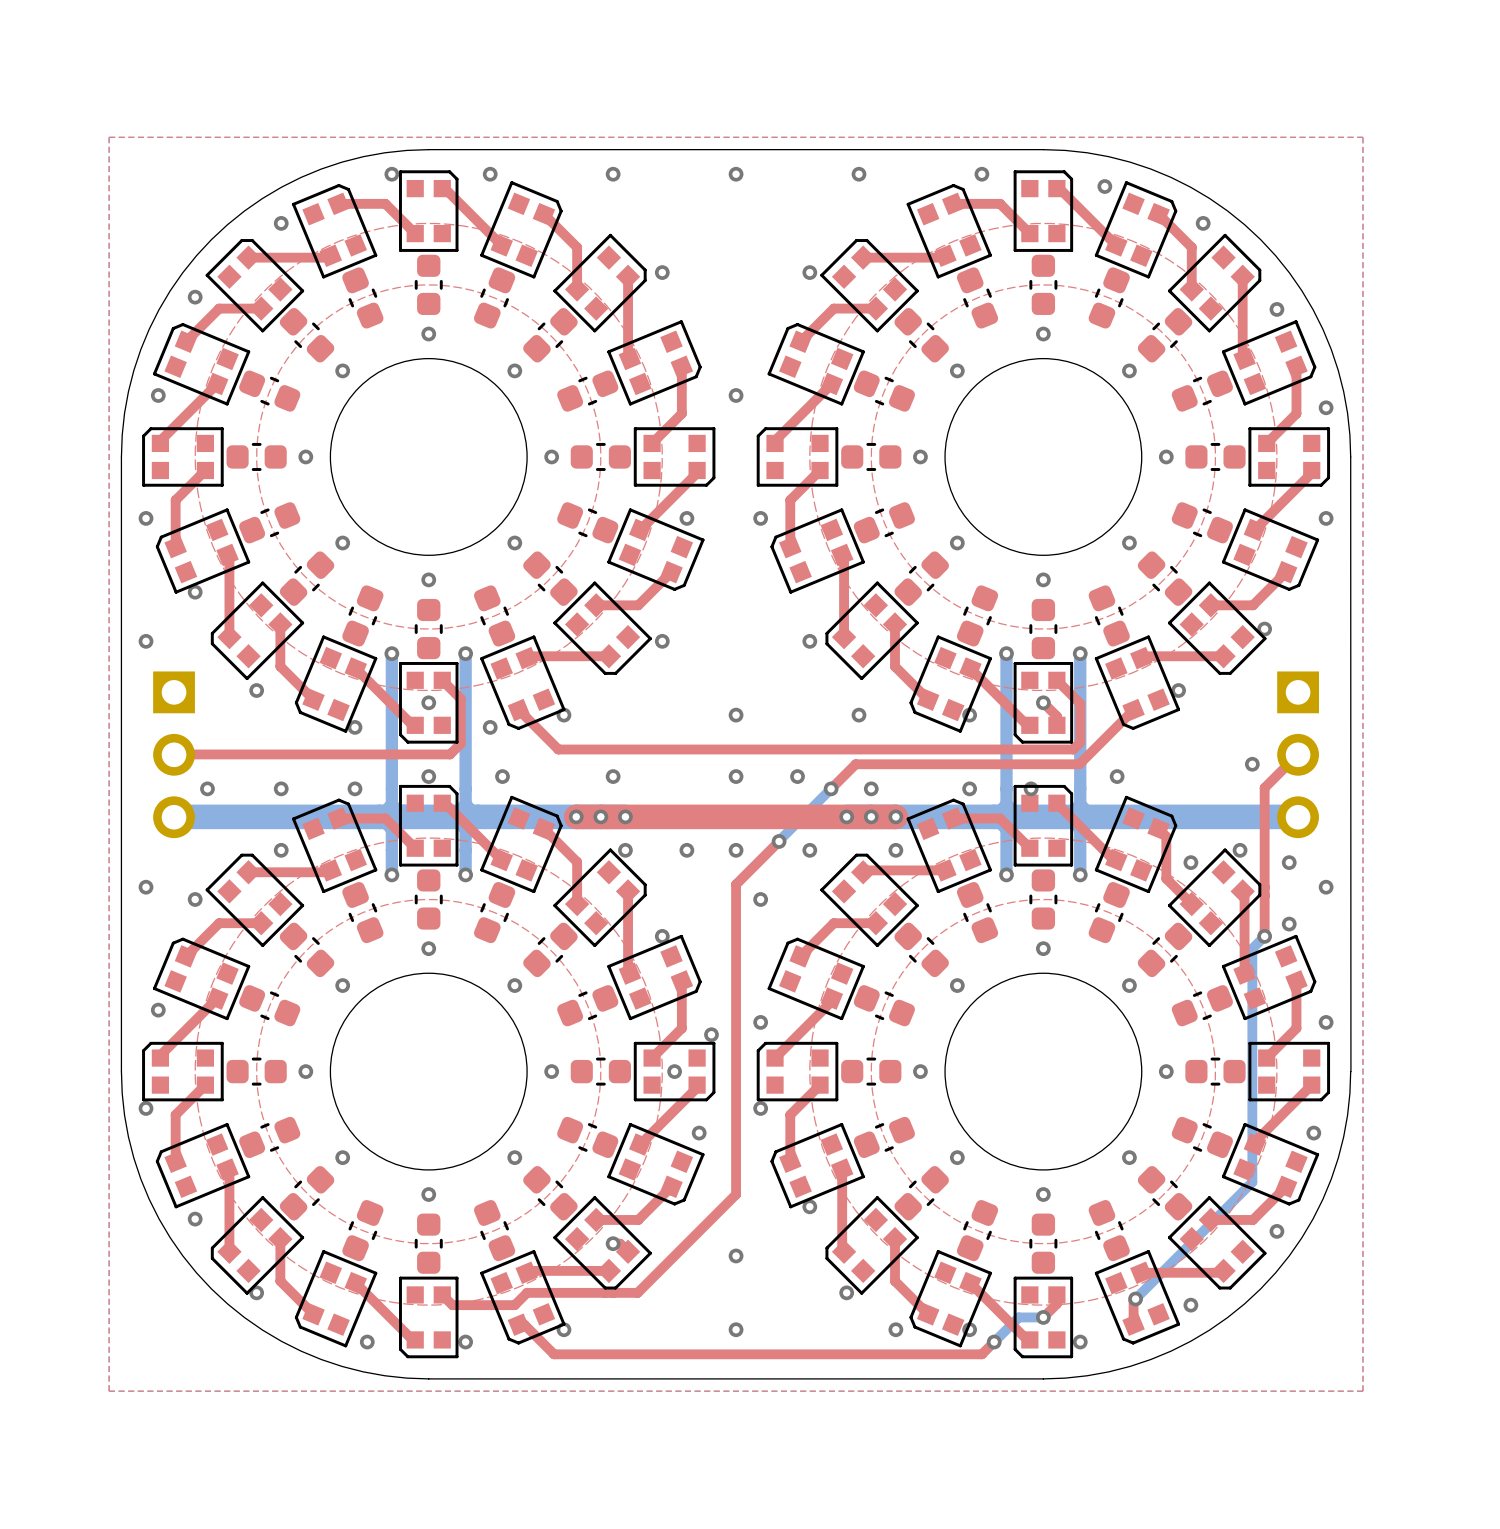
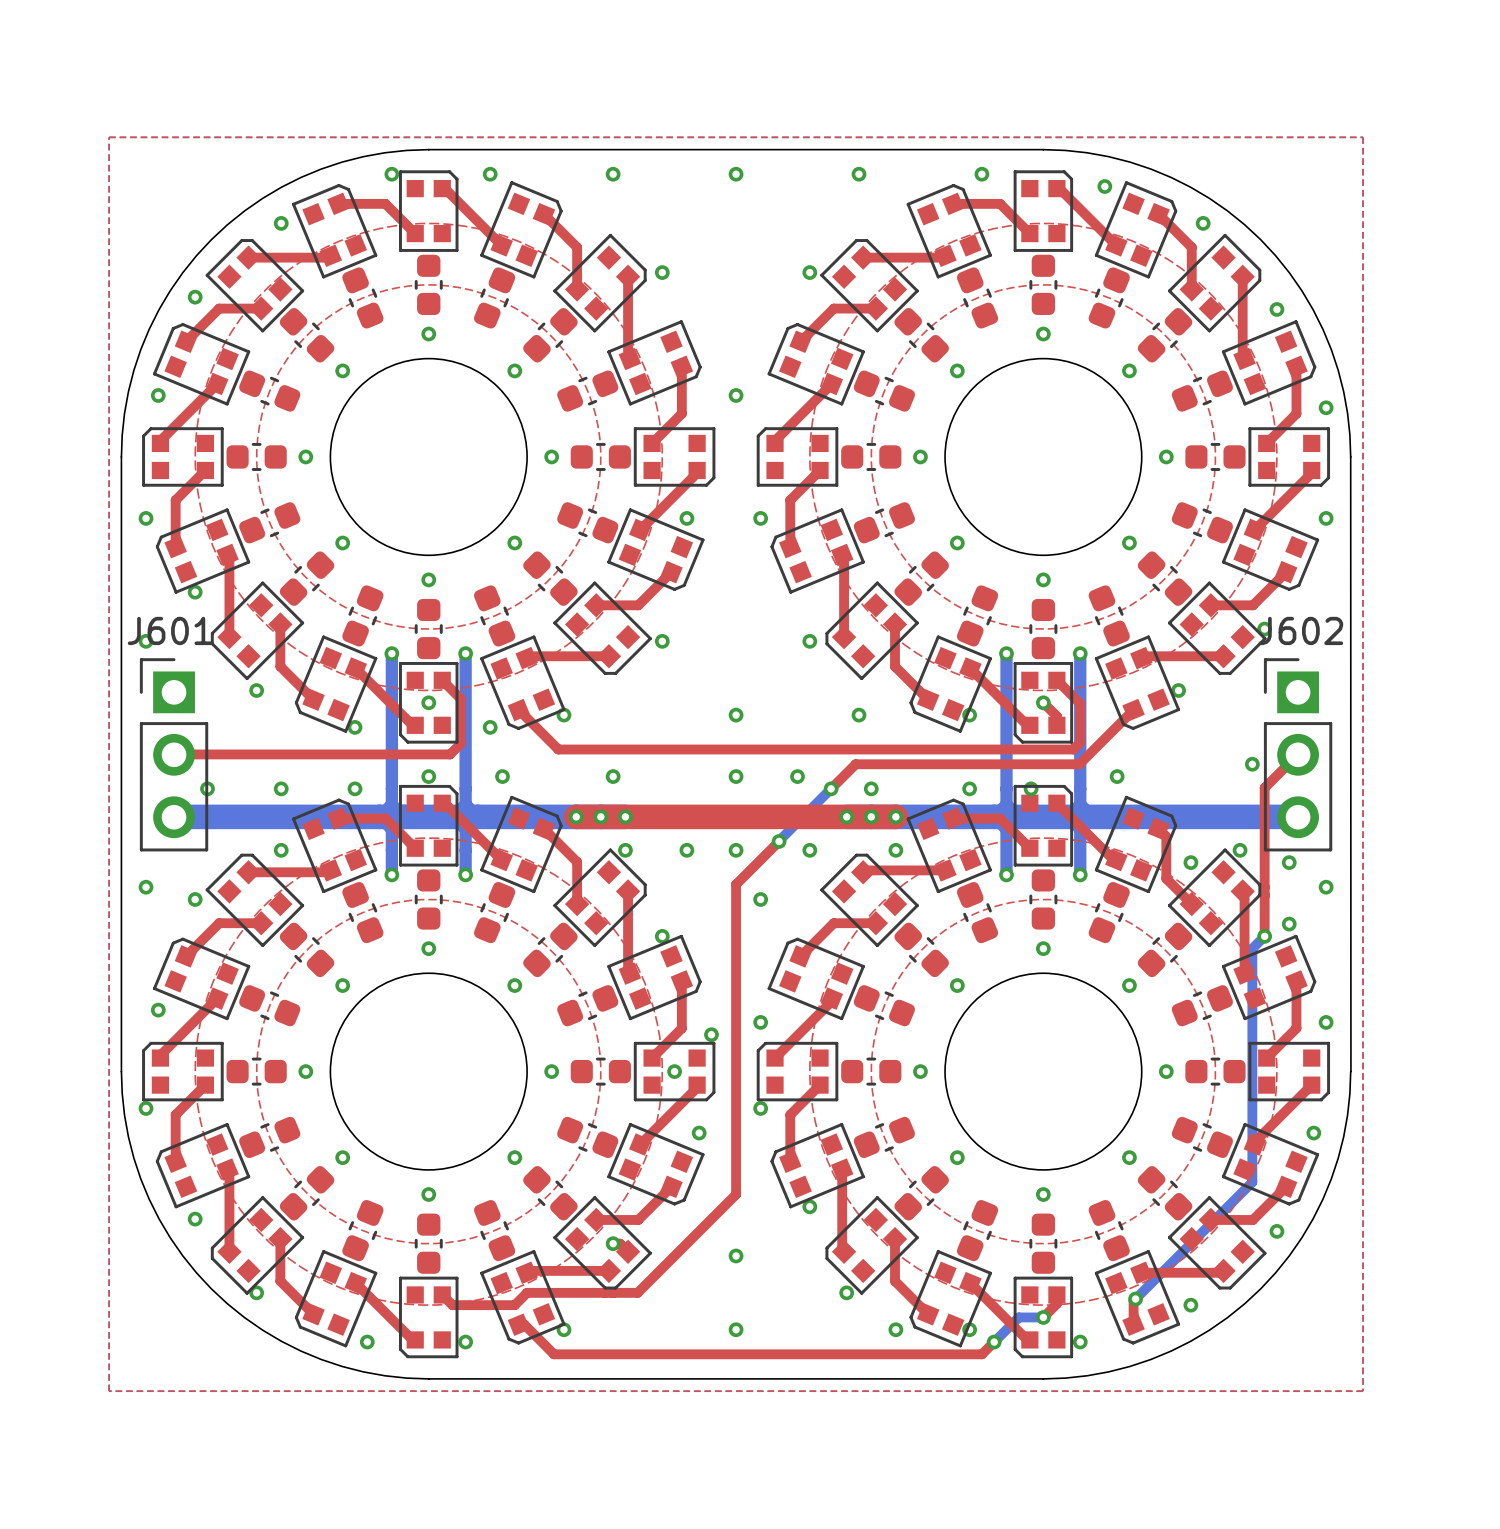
J601 side: bottom (174, 754) -> top (174, 754)
J602 side: bottom (1298, 754) -> top (1298, 754)

